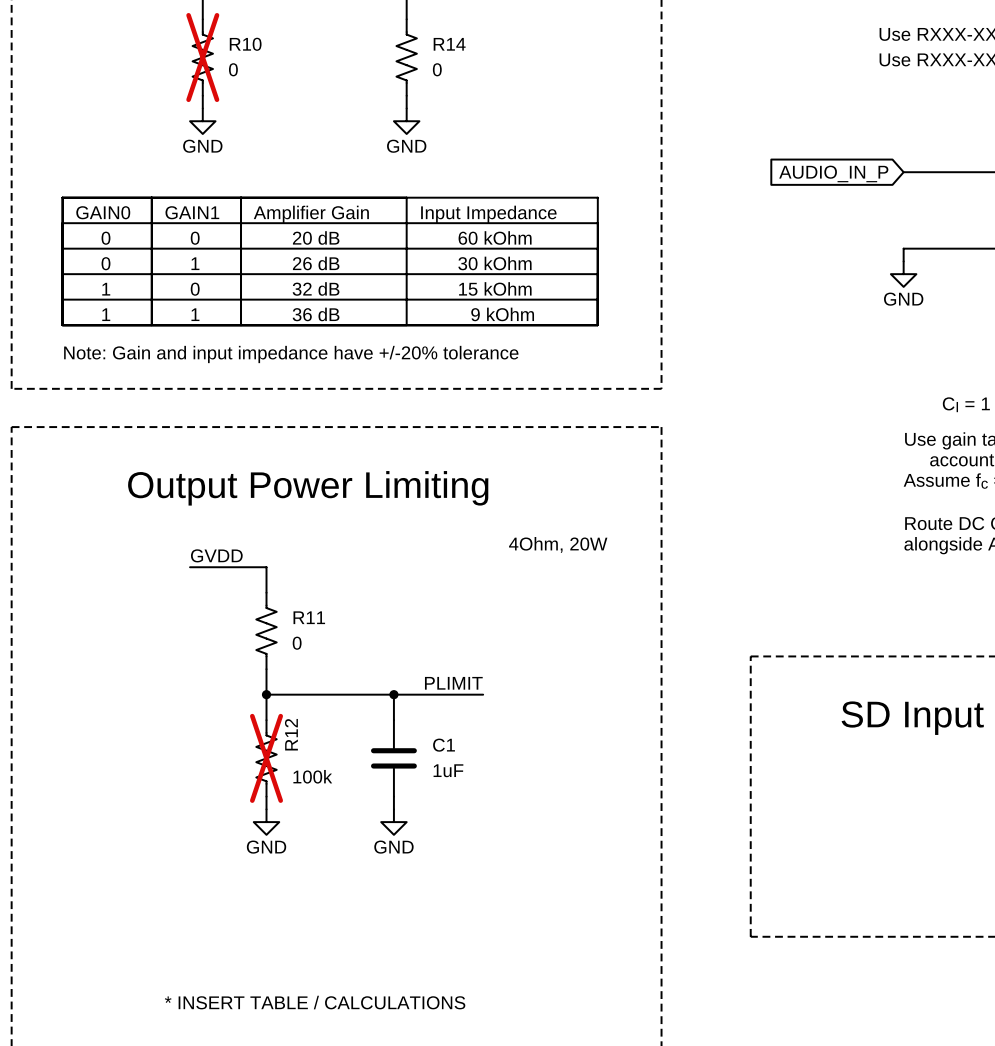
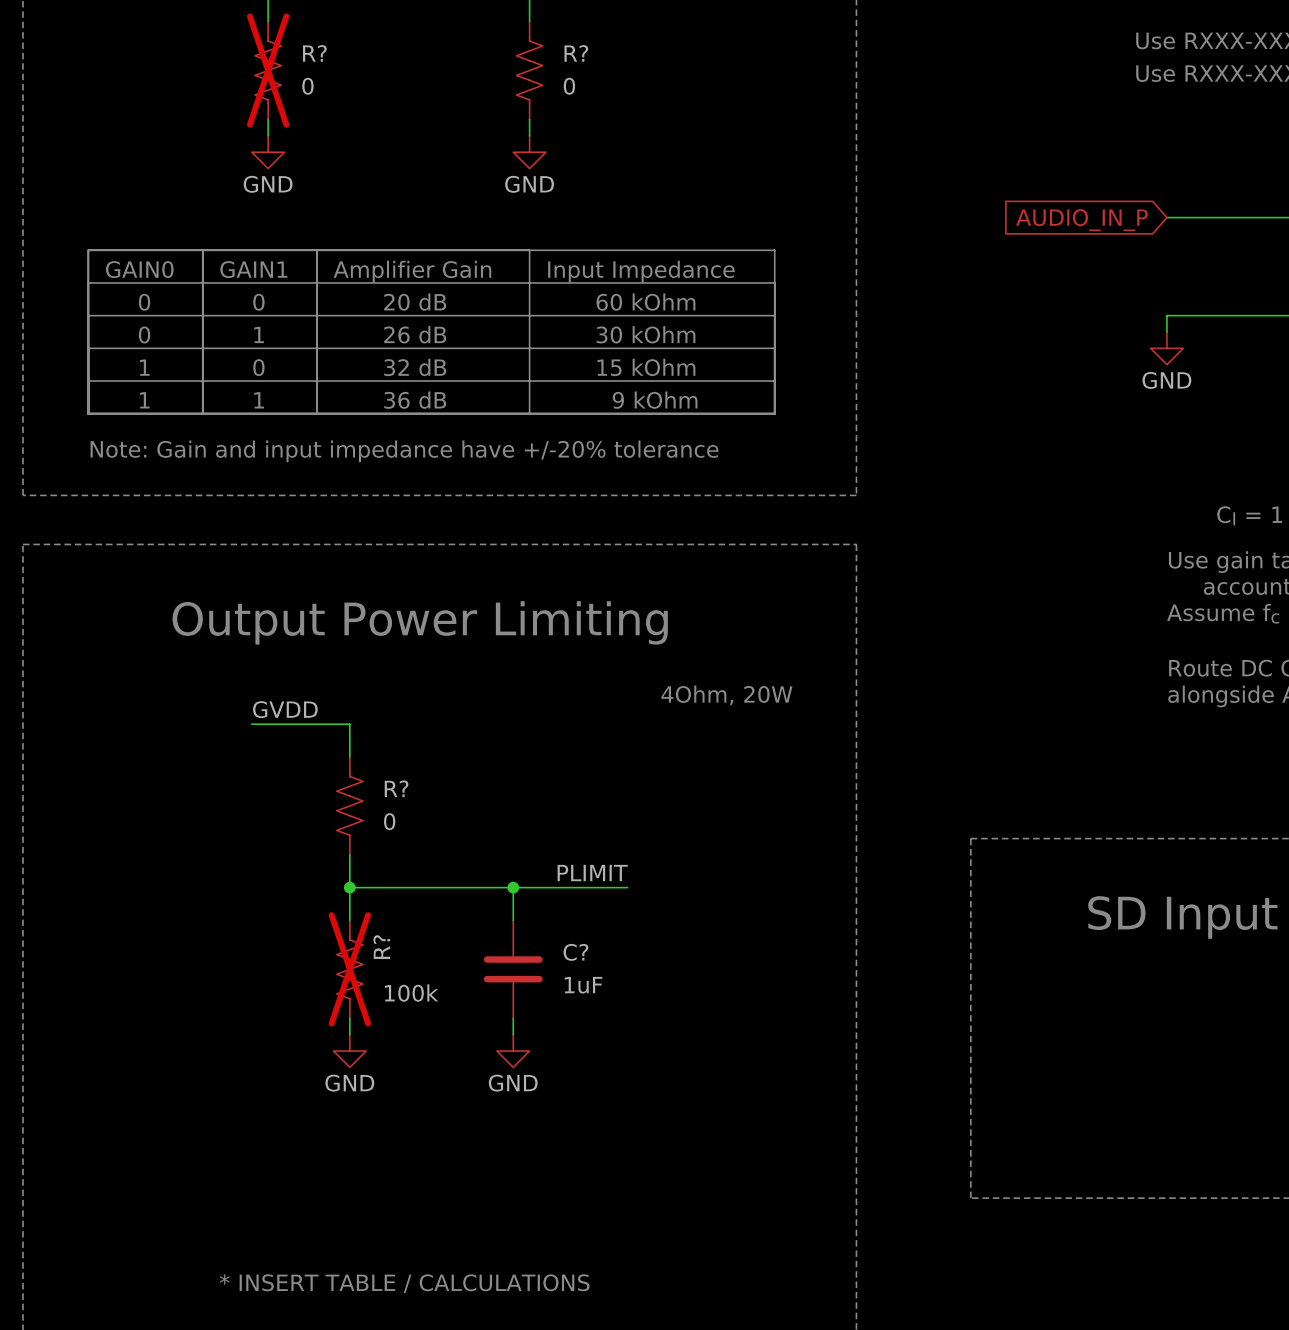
R10 name: R10 (245, 44) -> R? (314, 53)
R14 name: R14 (449, 44) -> R? (576, 53)
R11 name: R11 (309, 617) -> R? (396, 788)
R12 name: R12 (291, 734) -> R? (381, 947)
C1 name: C1 (444, 745) -> C? (575, 952)

